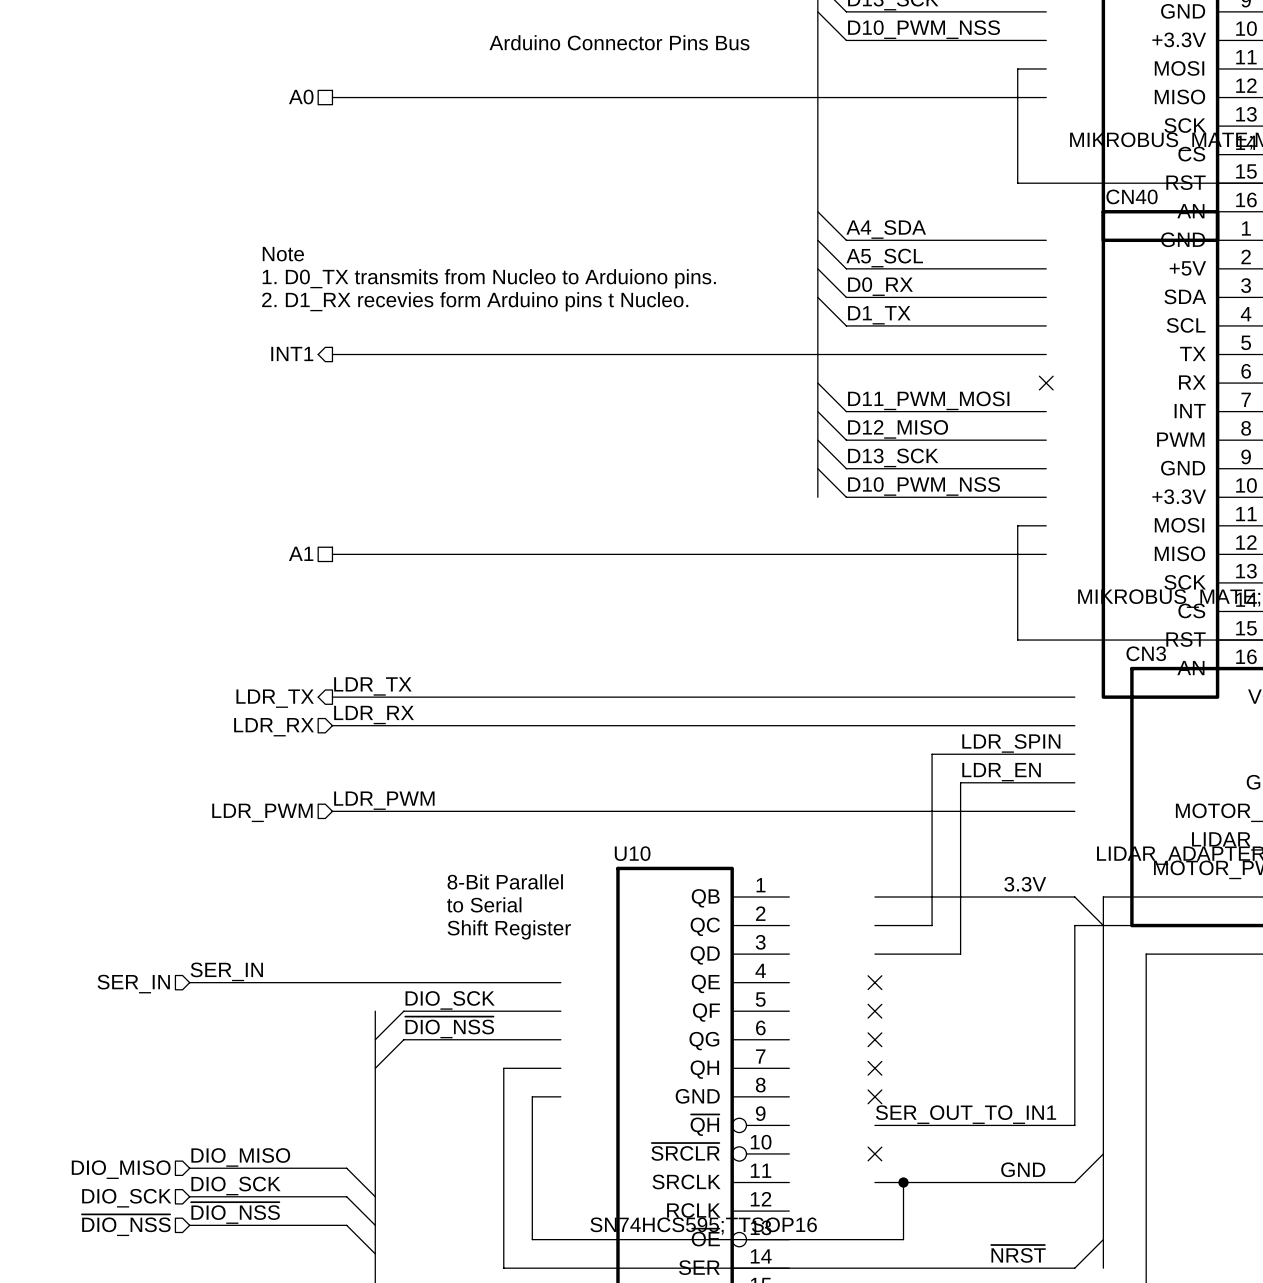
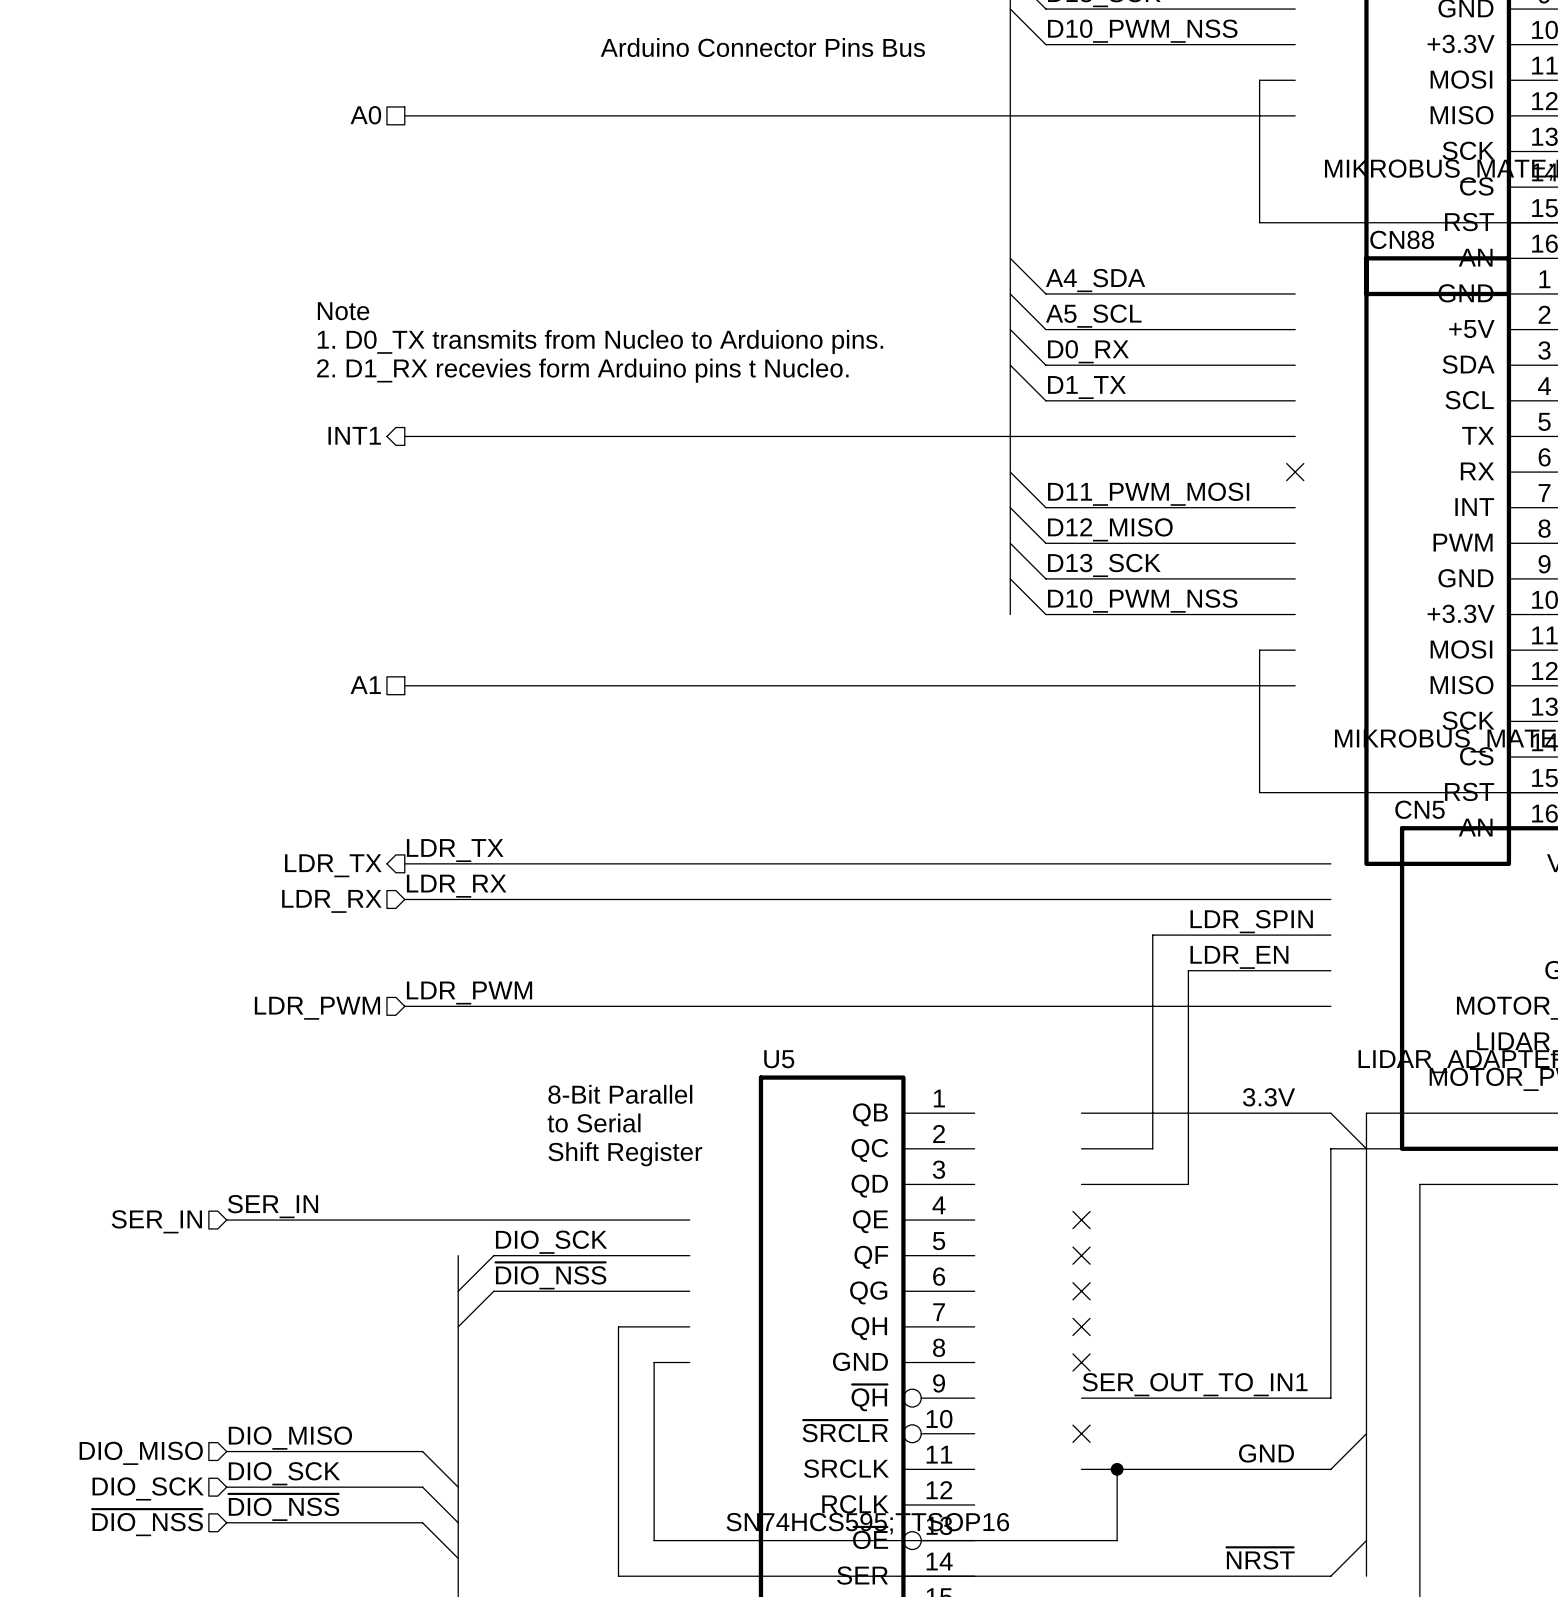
CN40 name: CN40 (1132, 196) -> CN88 (1402, 239)
CN3 name: CN3 (1146, 653) -> CN5 (1420, 809)
U10 name: U10 (632, 853) -> U5 (779, 1059)

